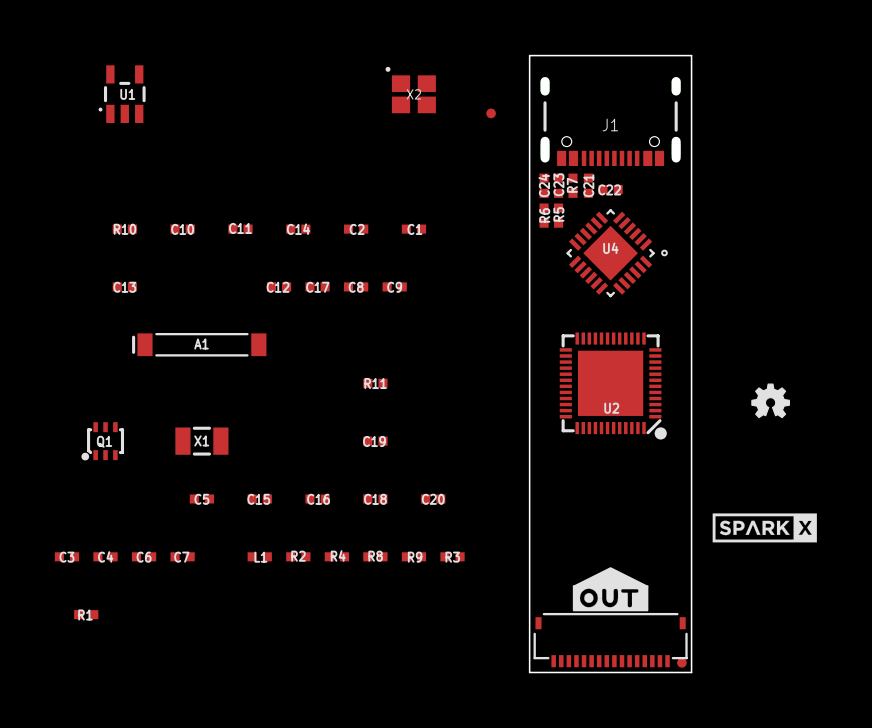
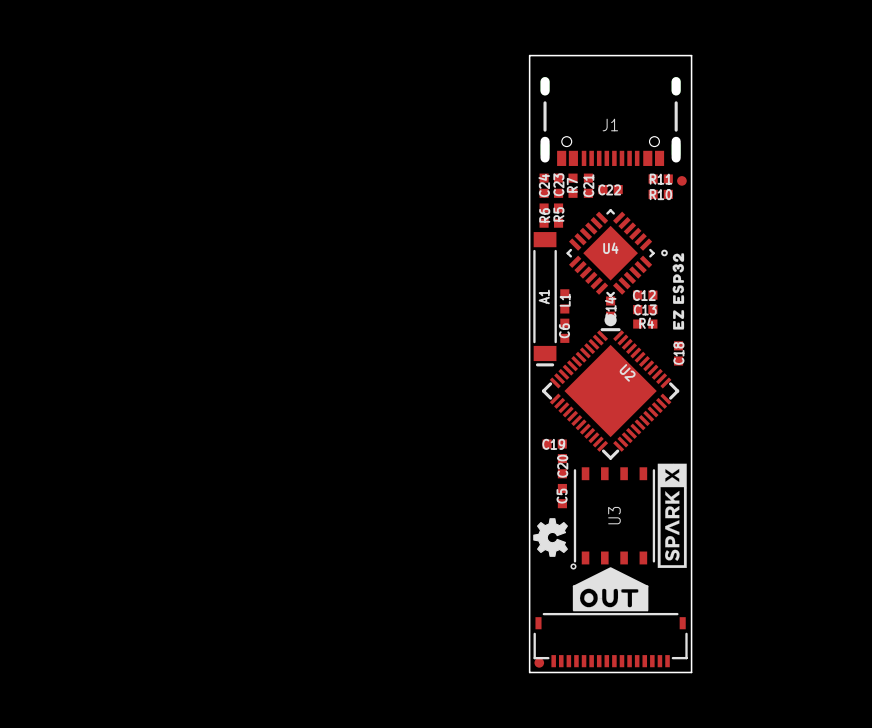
X2: (410, 90) -> none
U1: (122, 94) -> none
part position: (491, 113) -> (681, 180)
R10 position: (124, 229) -> (660, 194)
C10: (182, 229) -> none
C11: (240, 229) -> none
C14 rotation: 0° (298, 229) -> 90° clockwise (610, 308)
C14 position: (298, 229) -> (610, 308)
C2: (356, 229) -> none
C1: (413, 229) -> none
drawing: none -> [672, 253, 685, 330]
C13 position: (124, 286) -> (645, 309)
C12 position: (279, 286) -> (645, 295)
C17: (317, 286) -> none
C8: (356, 286) -> none
C9: (394, 286) -> none
A1 rotation: 0° (199, 344) -> 90° counterclockwise (545, 299)
A1 position: (199, 344) -> (545, 299)
R11 position: (375, 383) -> (660, 178)
drawing: [751, 383, 790, 419] -> none
U2 rotation: 0° (613, 386) -> 135° counterclockwise (610, 386)
Q1: (102, 441) -> none
X1: (201, 441) -> none
C19 position: (375, 441) -> (554, 444)
drawing: none -> [657, 463, 687, 568]
C5 rotation: 0° (201, 498) -> 90° clockwise (562, 496)
C5 position: (201, 498) -> (562, 496)
C15: (259, 498) -> none
C16: (317, 498) -> none
C18 rotation: 0° (375, 498) -> 90° clockwise (678, 353)
C18 position: (375, 498) -> (678, 353)
C20 rotation: 0° (433, 498) -> 90° clockwise (562, 466)
C20 position: (433, 498) -> (562, 466)
drawing: [712, 513, 817, 543] -> none
drawing: none -> [533, 518, 568, 557]
U3: none -> (612, 518)
C3: (66, 556) -> none
C4: (105, 556) -> none
C6 rotation: 0° (144, 556) -> 90° clockwise (564, 330)
C6 position: (144, 556) -> (564, 330)
C7: (182, 556) -> none
L1 rotation: 0° (259, 556) -> 90° clockwise (564, 301)
L1 position: (259, 556) -> (564, 301)
R2: (298, 556) -> none
R4 position: (336, 556) -> (645, 324)
R8: (375, 556) -> none
R9: (413, 556) -> none
R3: (452, 556) -> none
R1: (86, 614) -> none
part position: (681, 662) -> (539, 662)

